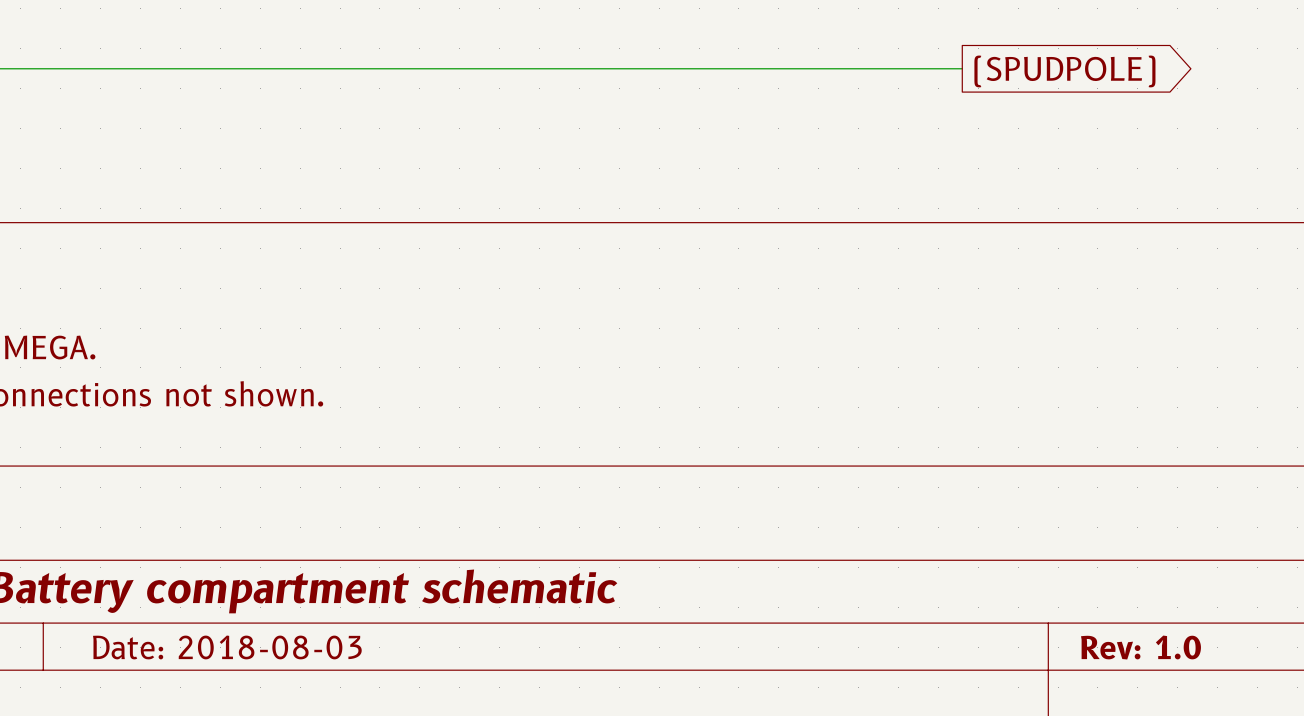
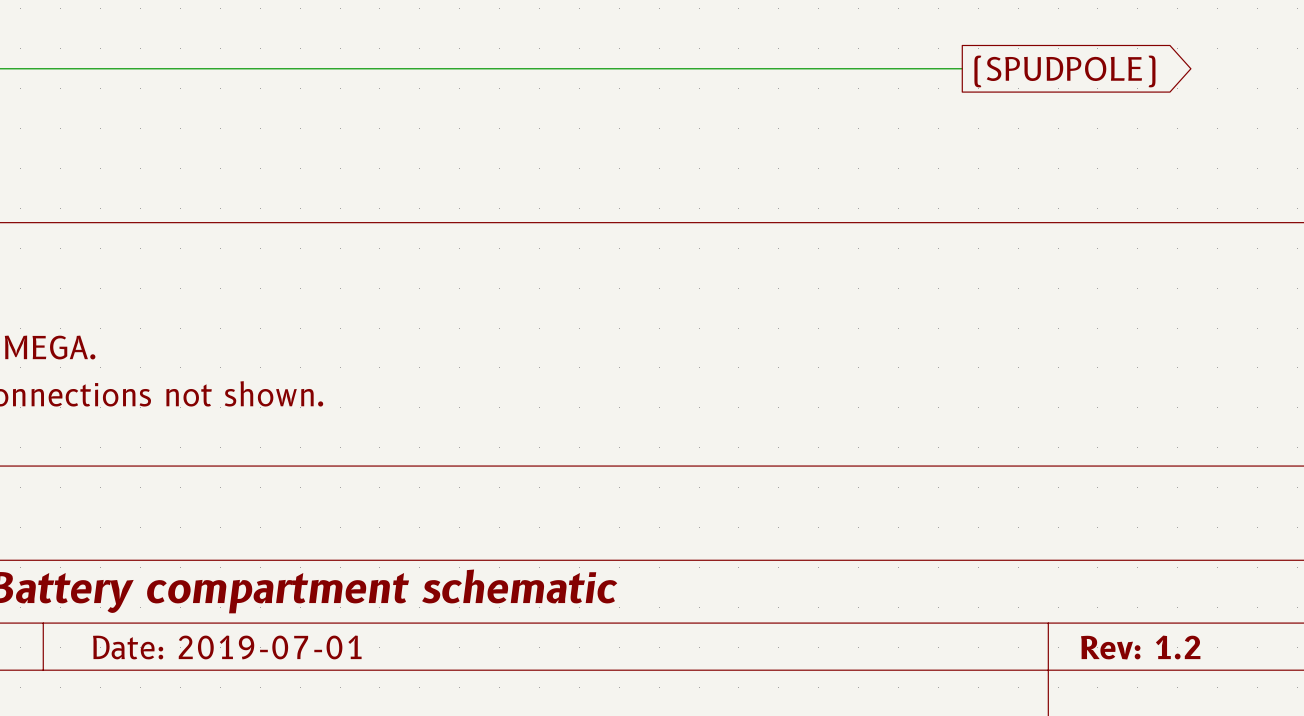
title block: Date: 2018-08-03 (227, 647) -> Date: 2019-07-01 (227, 647)
title block: Rev: 1.0 (1140, 647) -> Rev: 1.2 (1140, 647)

